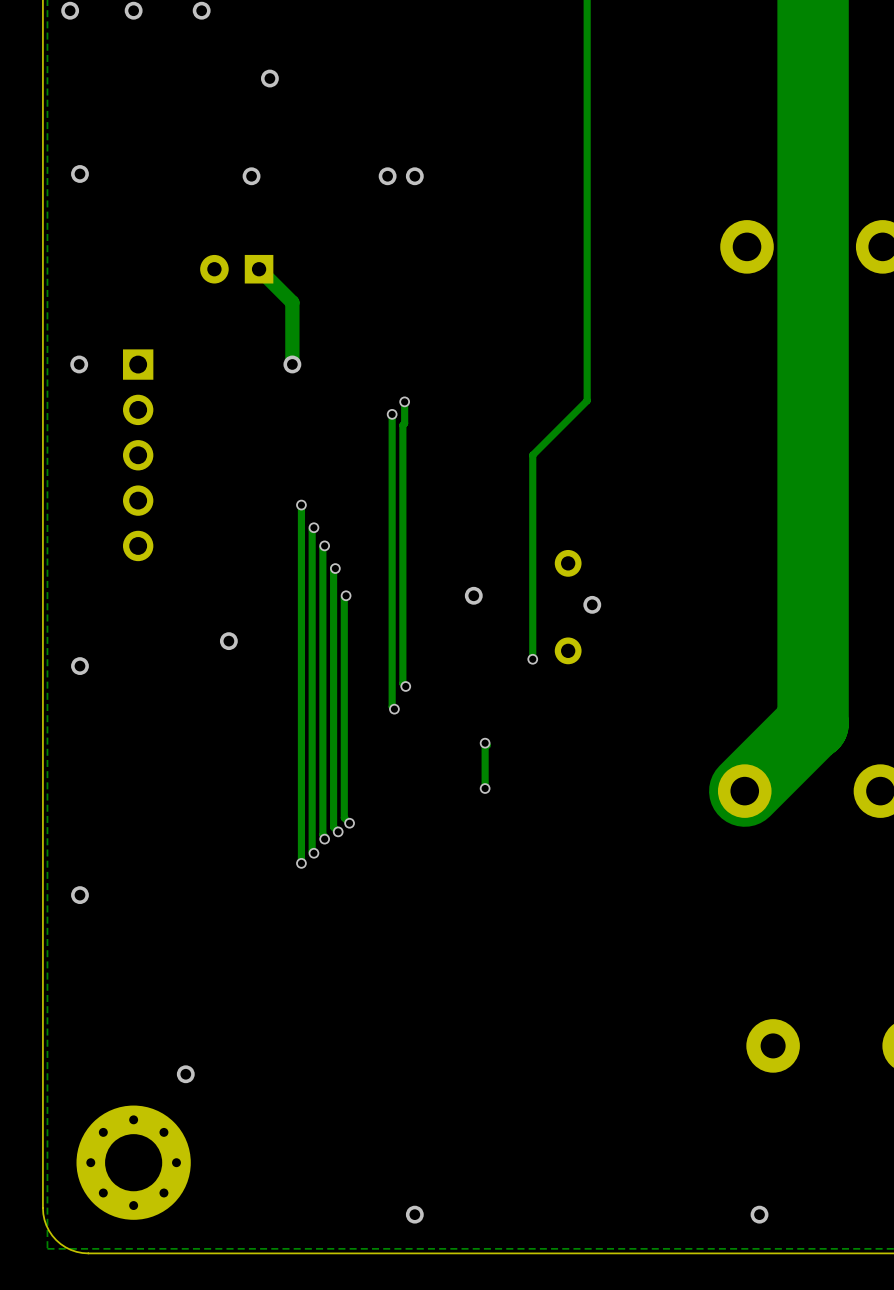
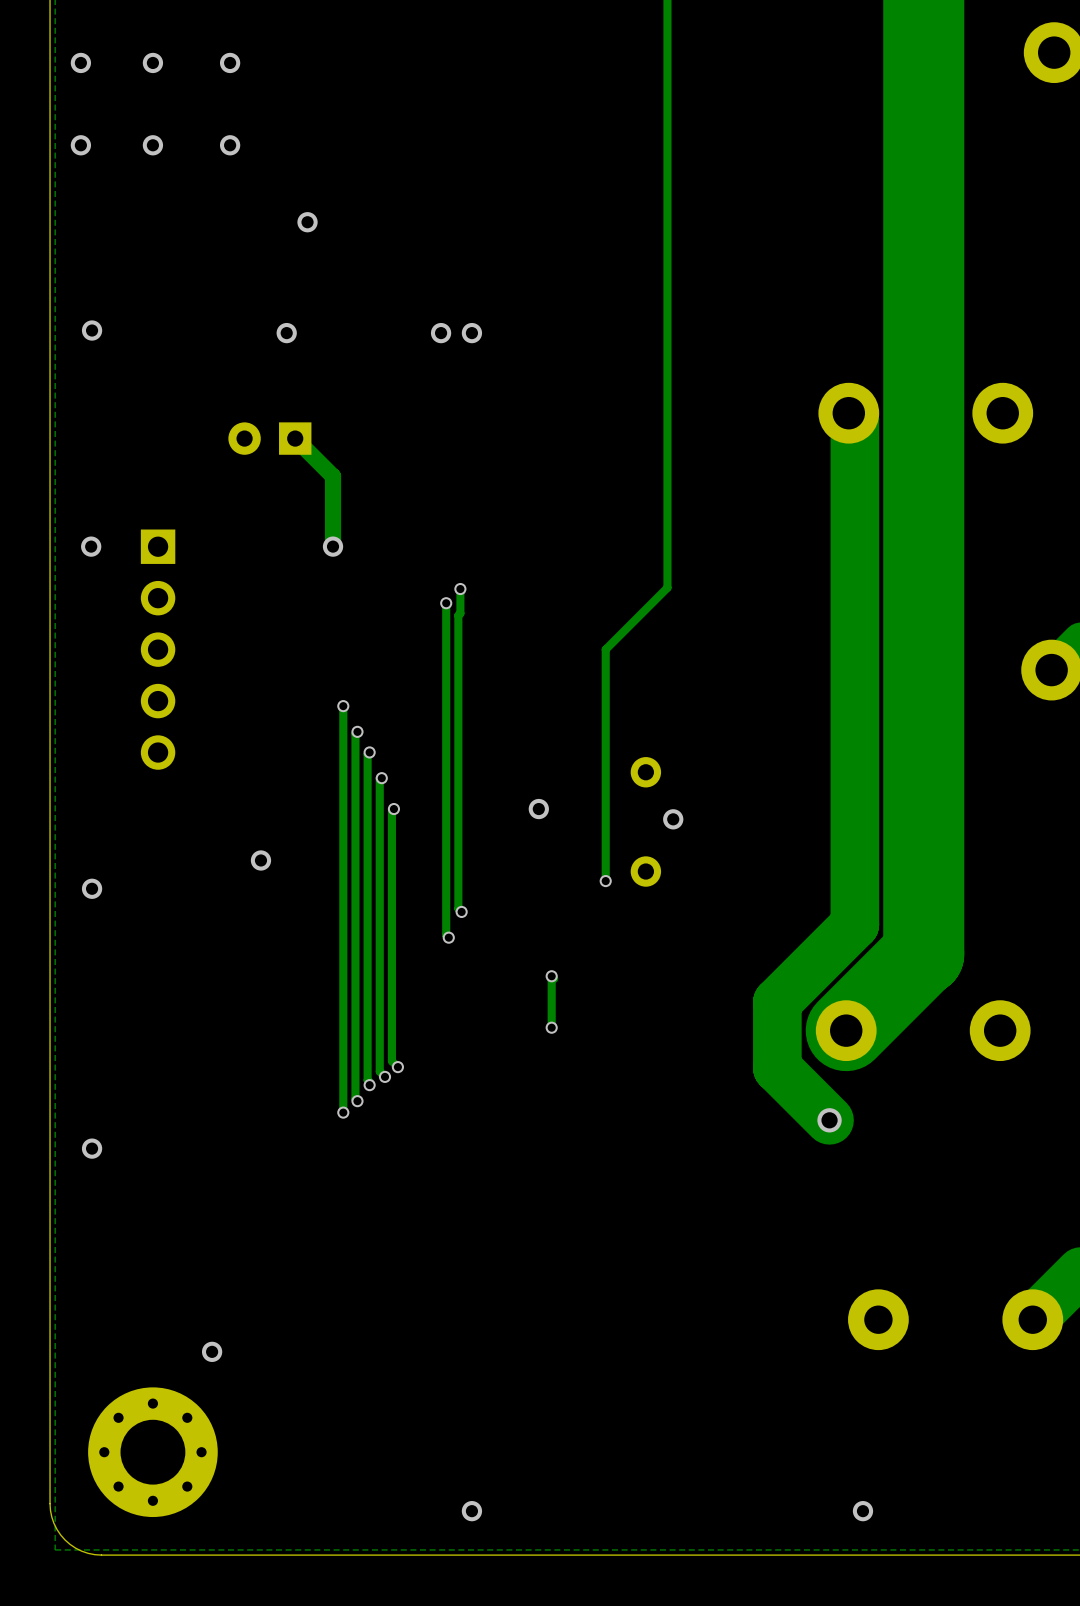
track: none -> (848, 413) (854, 419) (854, 924) (777, 1002) (777, 1068) (829, 1120)
via: none -> (829, 1120)

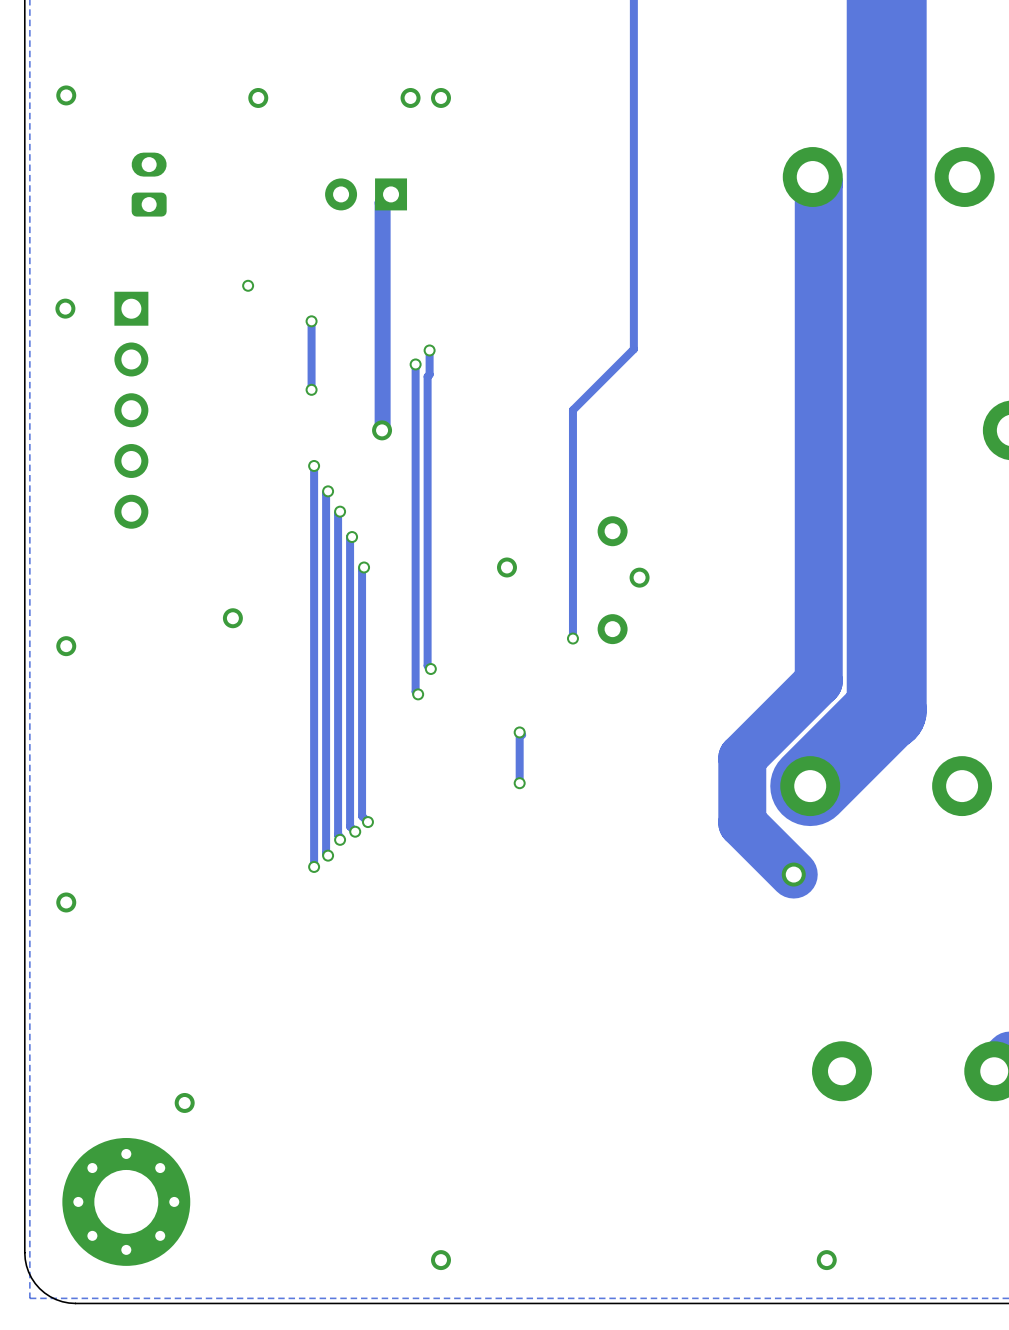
part: none -> (149, 184)
track: none -> (391, 194) (382, 202) (382, 430)
part position: (269, 438) -> (366, 194)
track: (295, 438) (333, 476) (333, 546) -> none
via: none -> (248, 285)
via size: [322, 536, 344, 557] -> [305, 315, 318, 328]
track: none -> (311, 321) (311, 389)
via: none -> (311, 389)
via: none -> (382, 430)

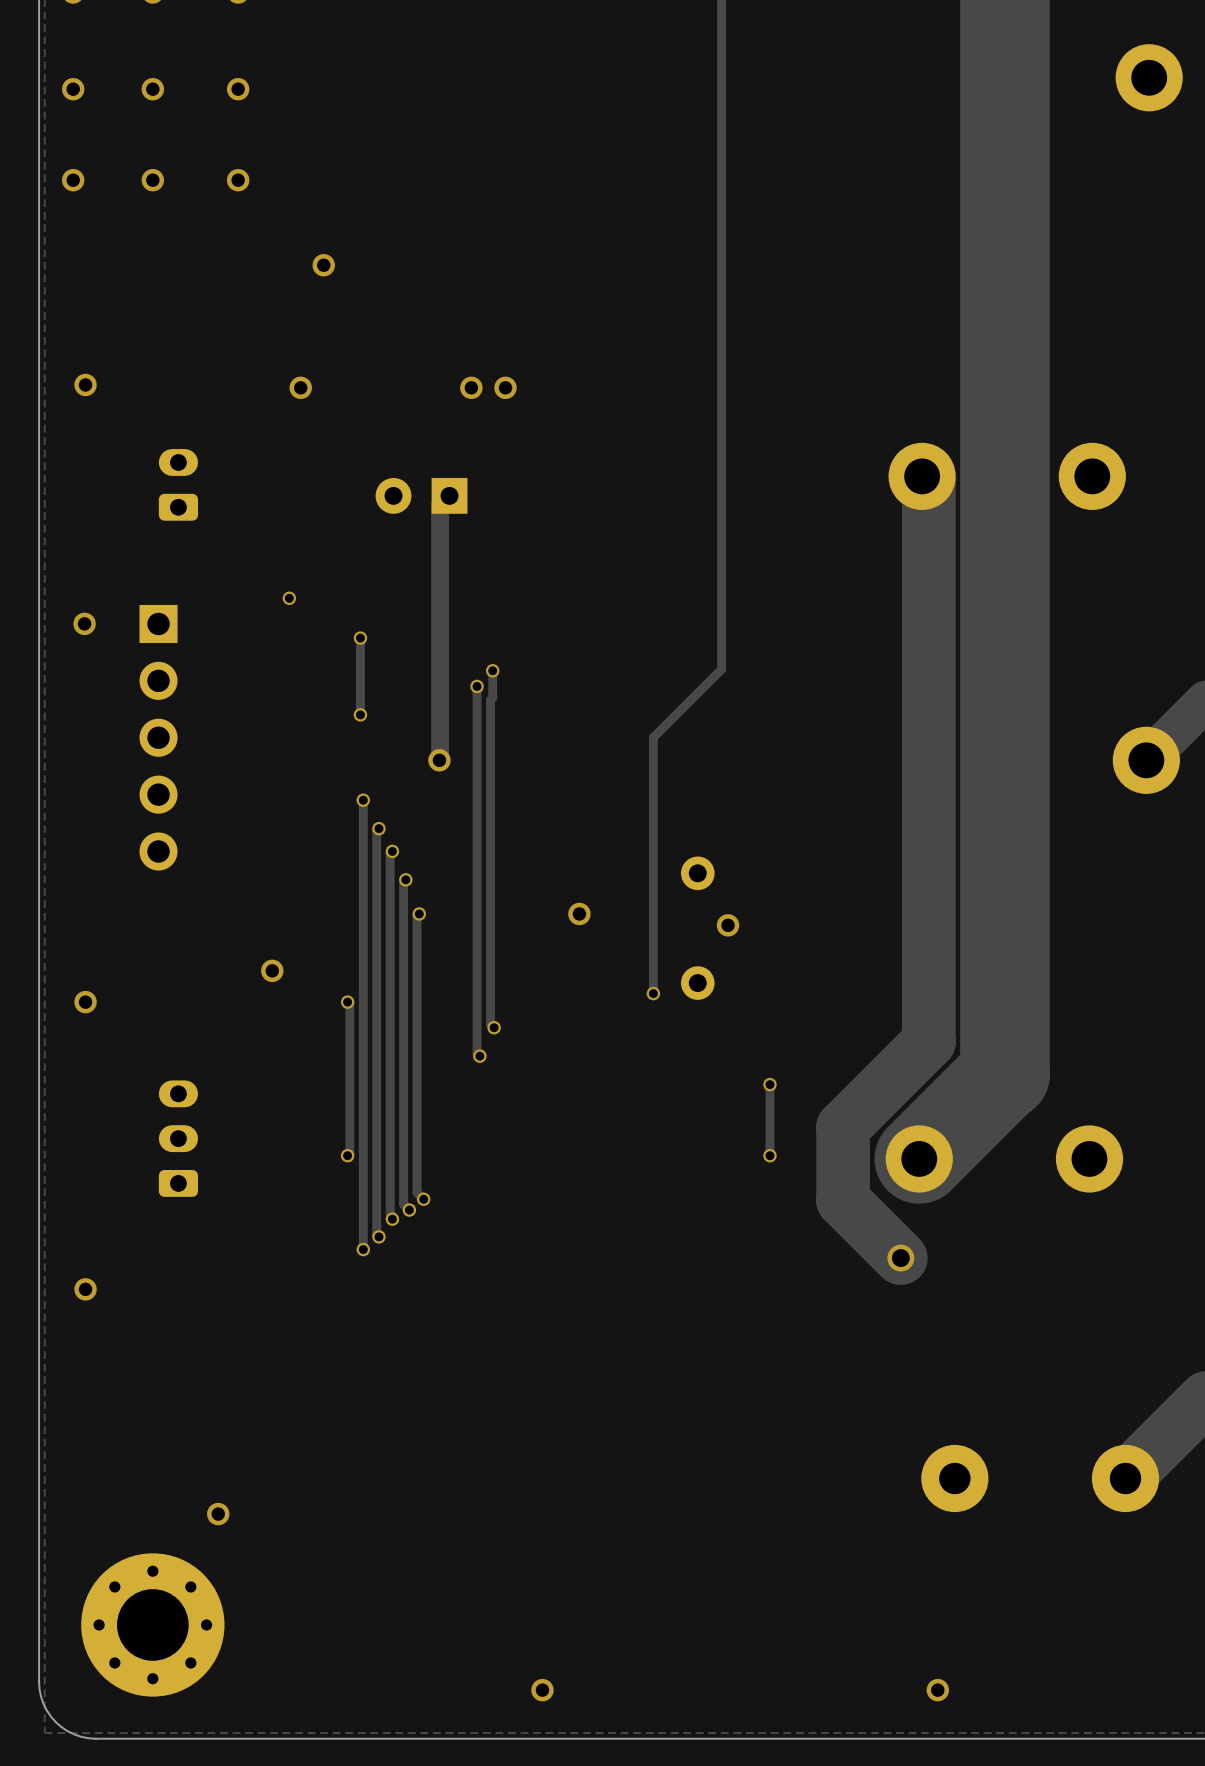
track: none -> (347, 1002) (349, 1002) (349, 1153) (347, 1155)
via: none -> (347, 1002)
track: none -> (769, 1084) (769, 1155)
via: none -> (769, 1084)
via: (519, 732) -> none
track: (522, 734) (519, 732) (519, 783) -> none
part: none -> (178, 1138)
via: none -> (347, 1155)
via: (519, 783) -> none
via: none -> (769, 1155)
via position: (441, 1260) -> (542, 1690)

